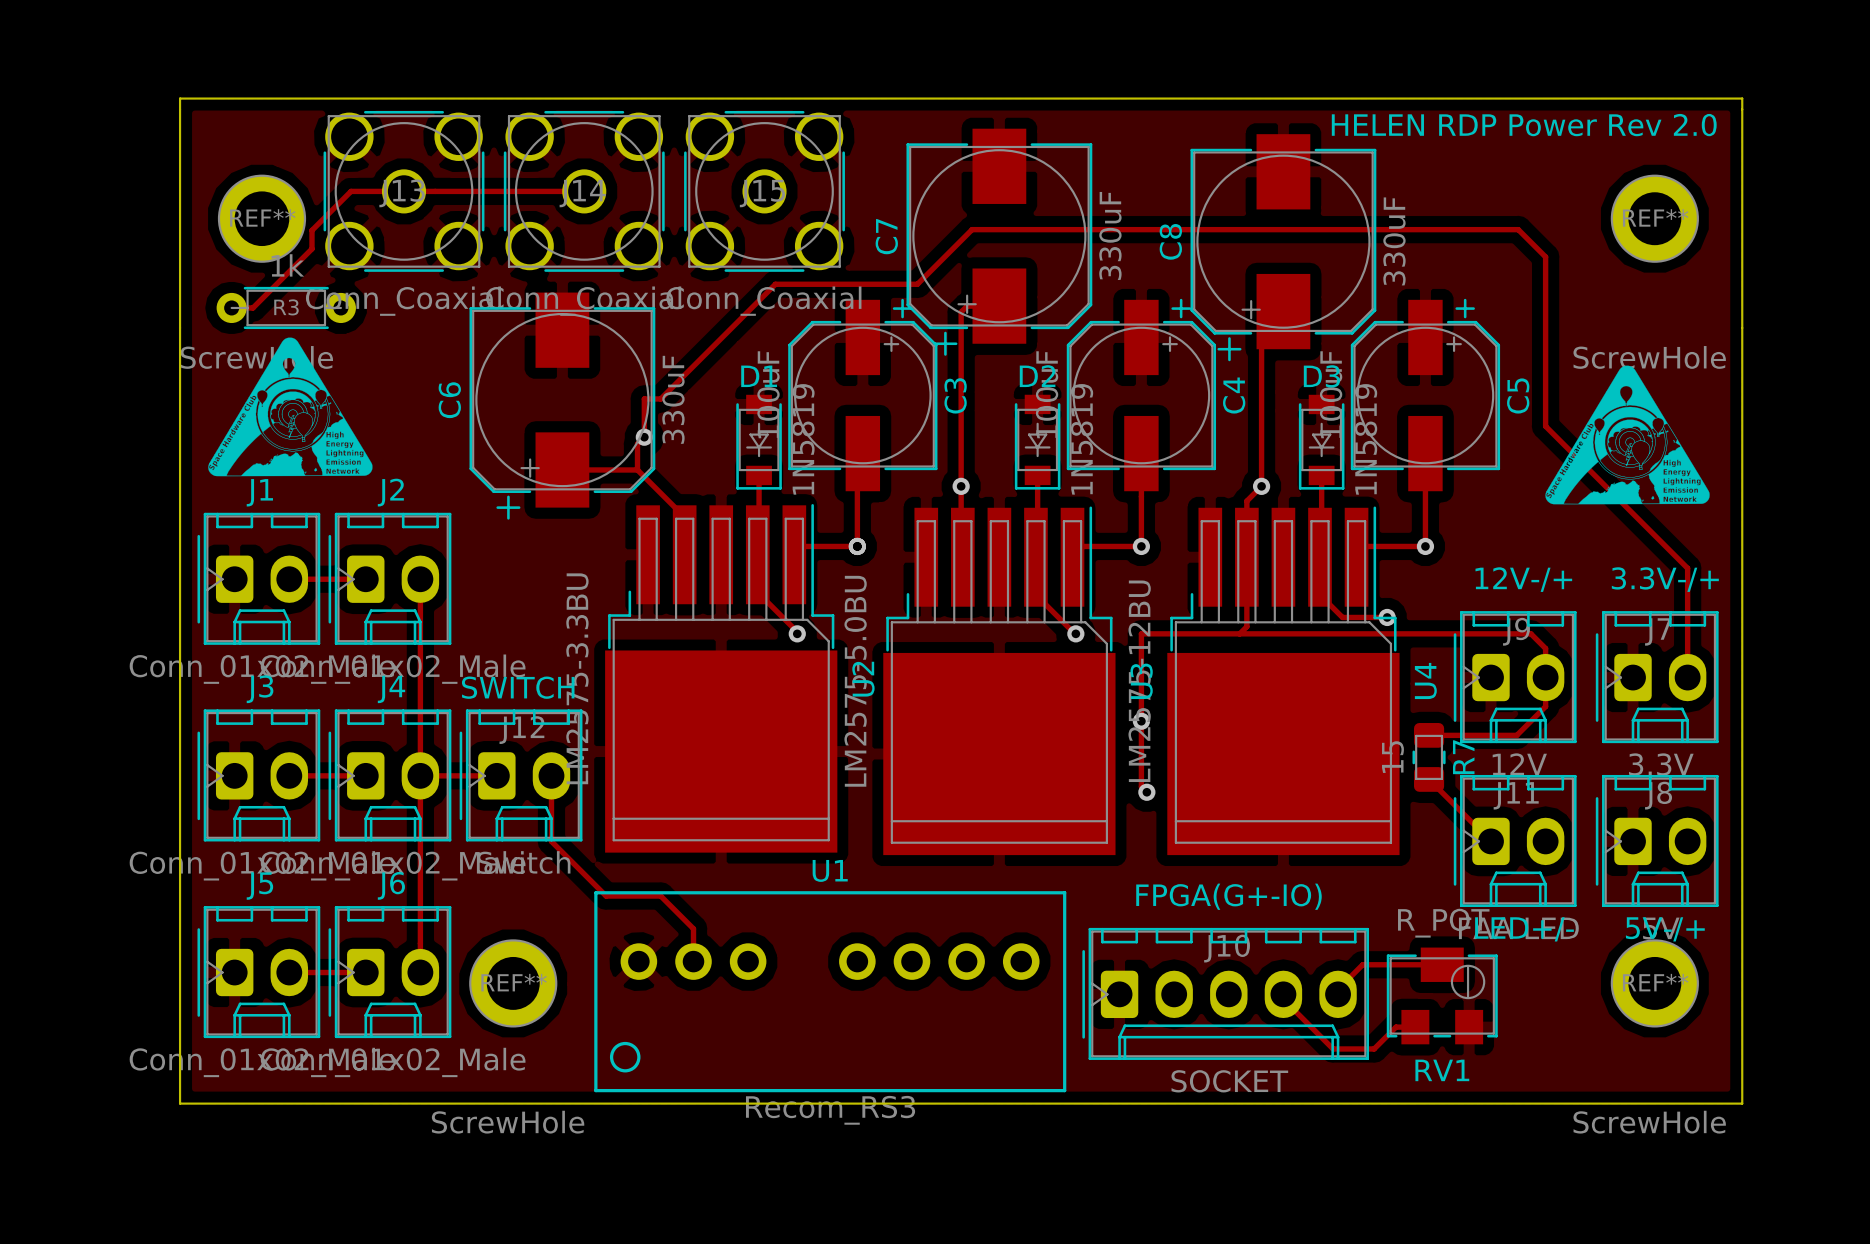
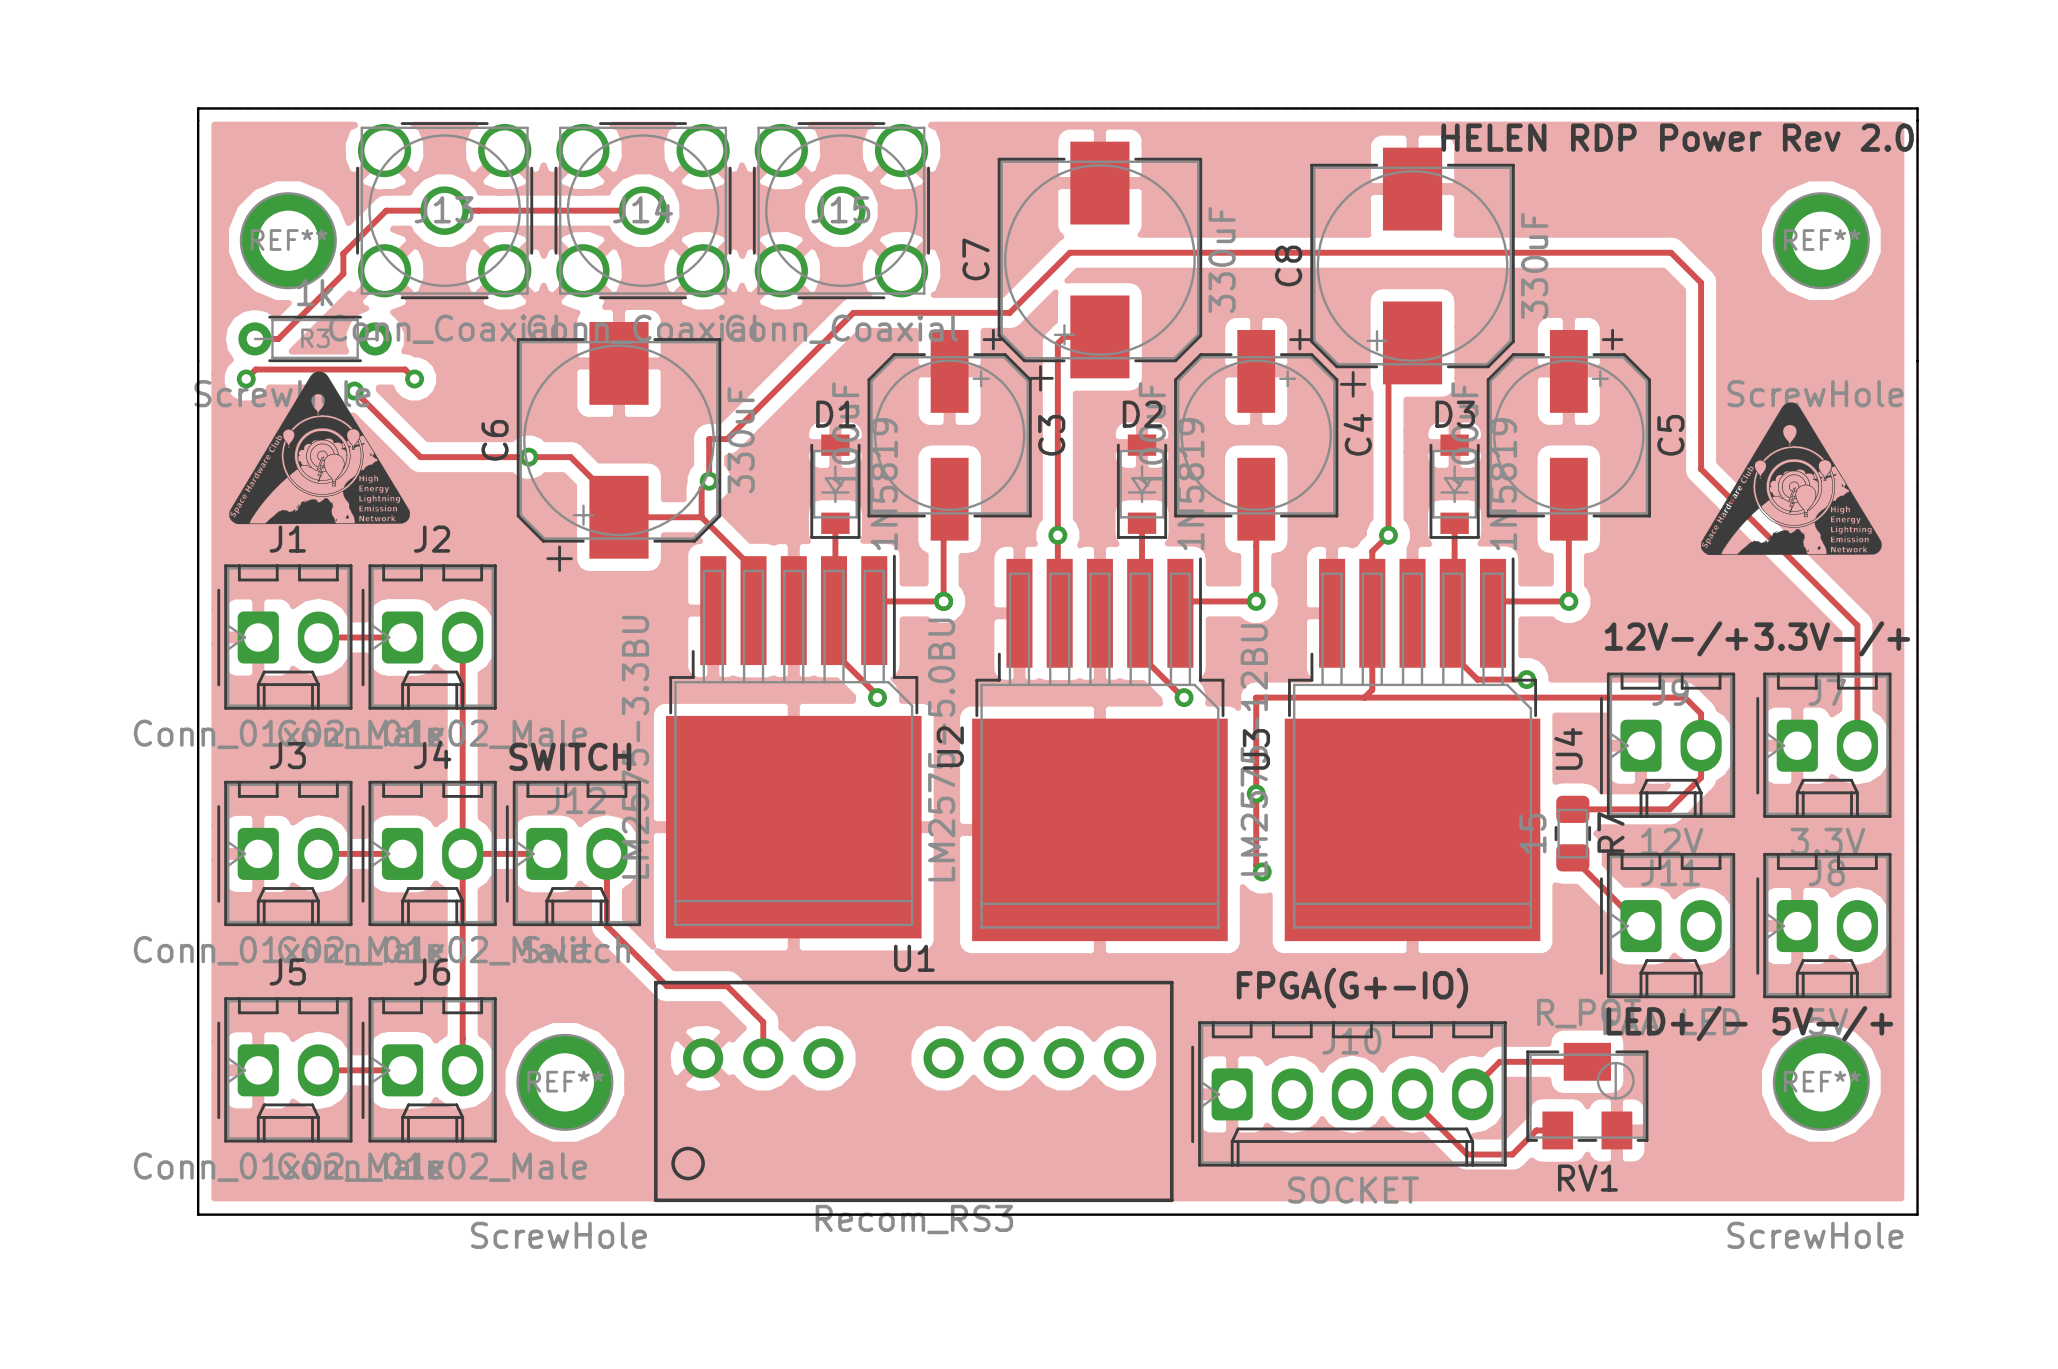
track: none -> (246, 378) (255, 369) (405, 369) (414, 378)
via: none -> (246, 378)
via: none -> (414, 378)
track: none -> (354, 391) (420, 457) (570, 457) (618, 505) (618, 517)
via: none -> (354, 391)
via: none -> (528, 457)

